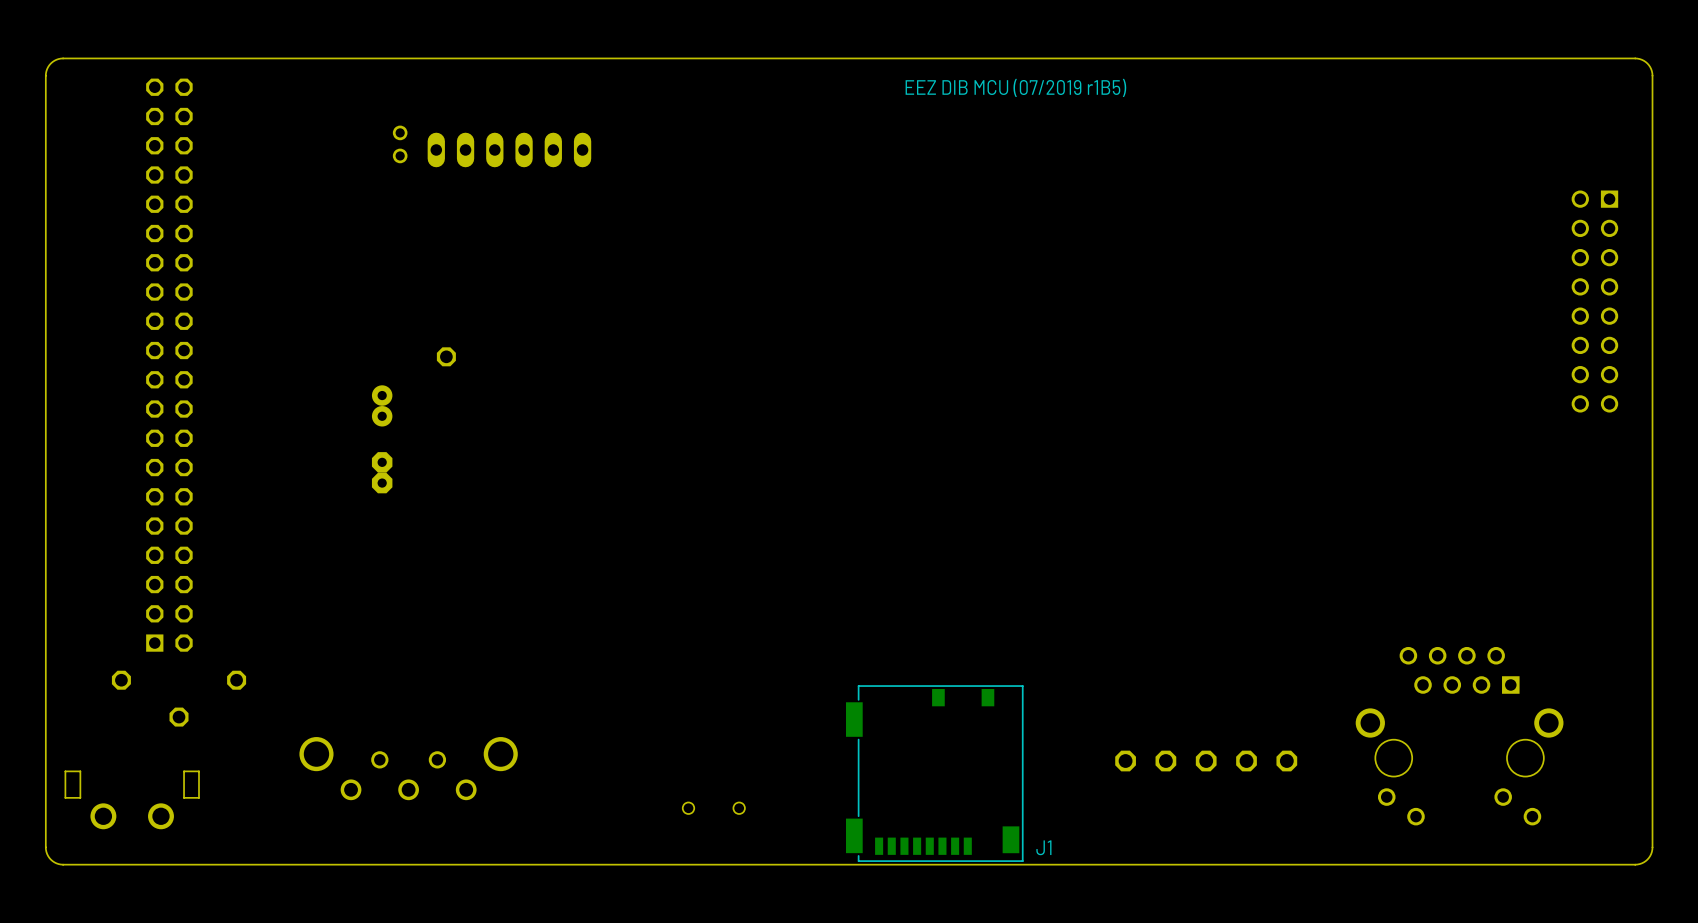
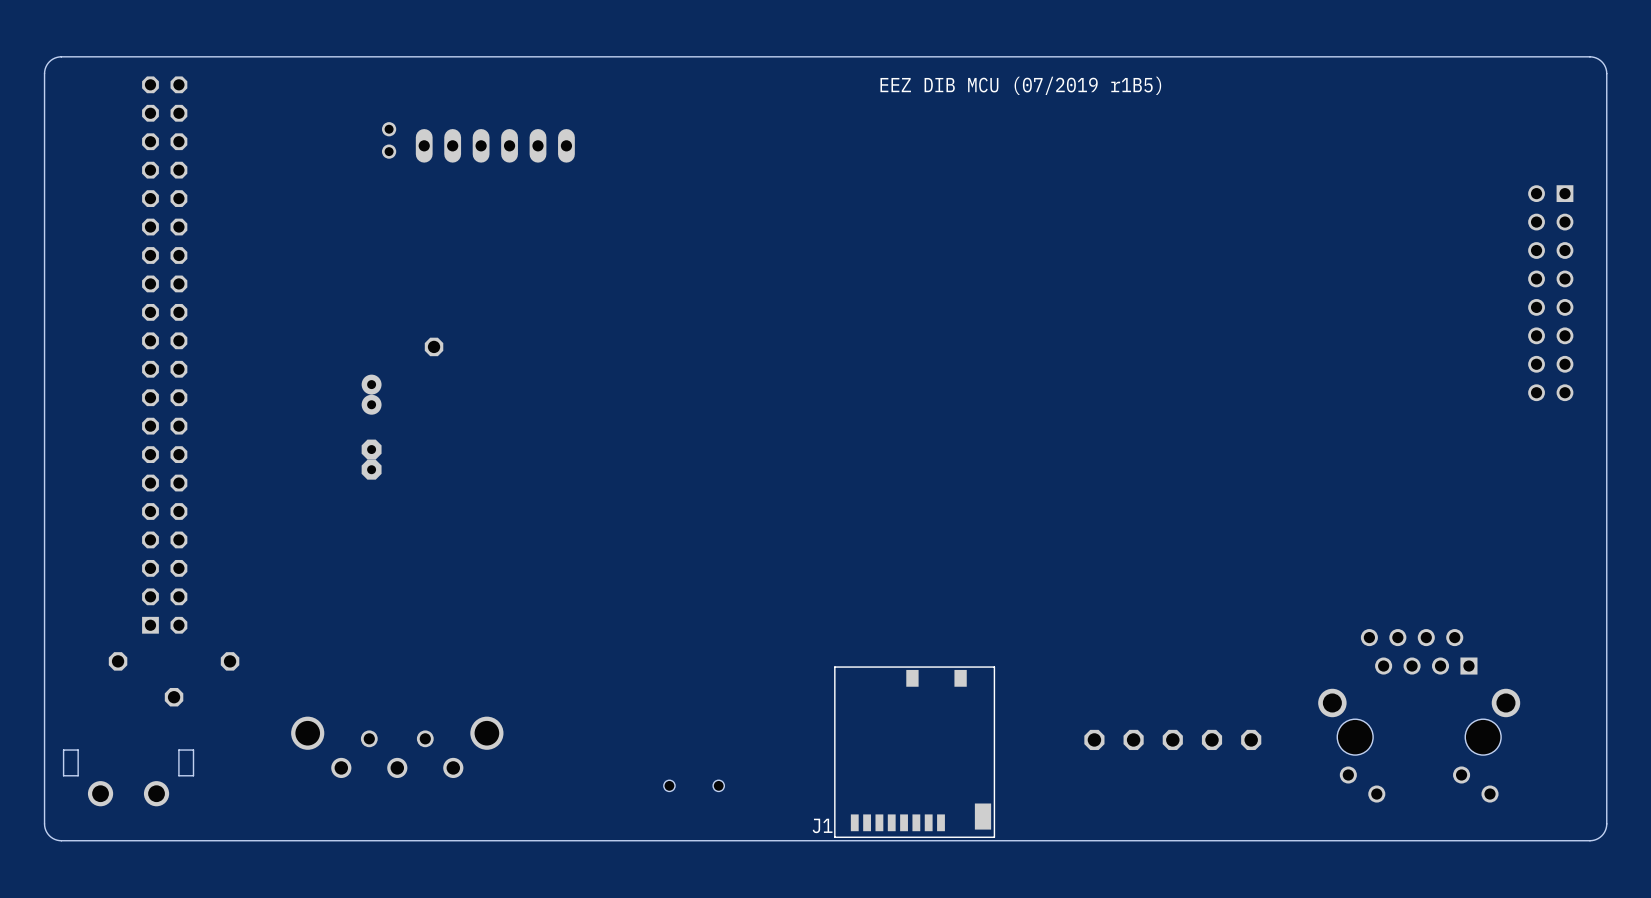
J1 footprint: [845, 685, 1024, 862] -> [834, 666, 996, 838]
J1 name position: J1 (1043, 847) -> J1 (822, 825)

